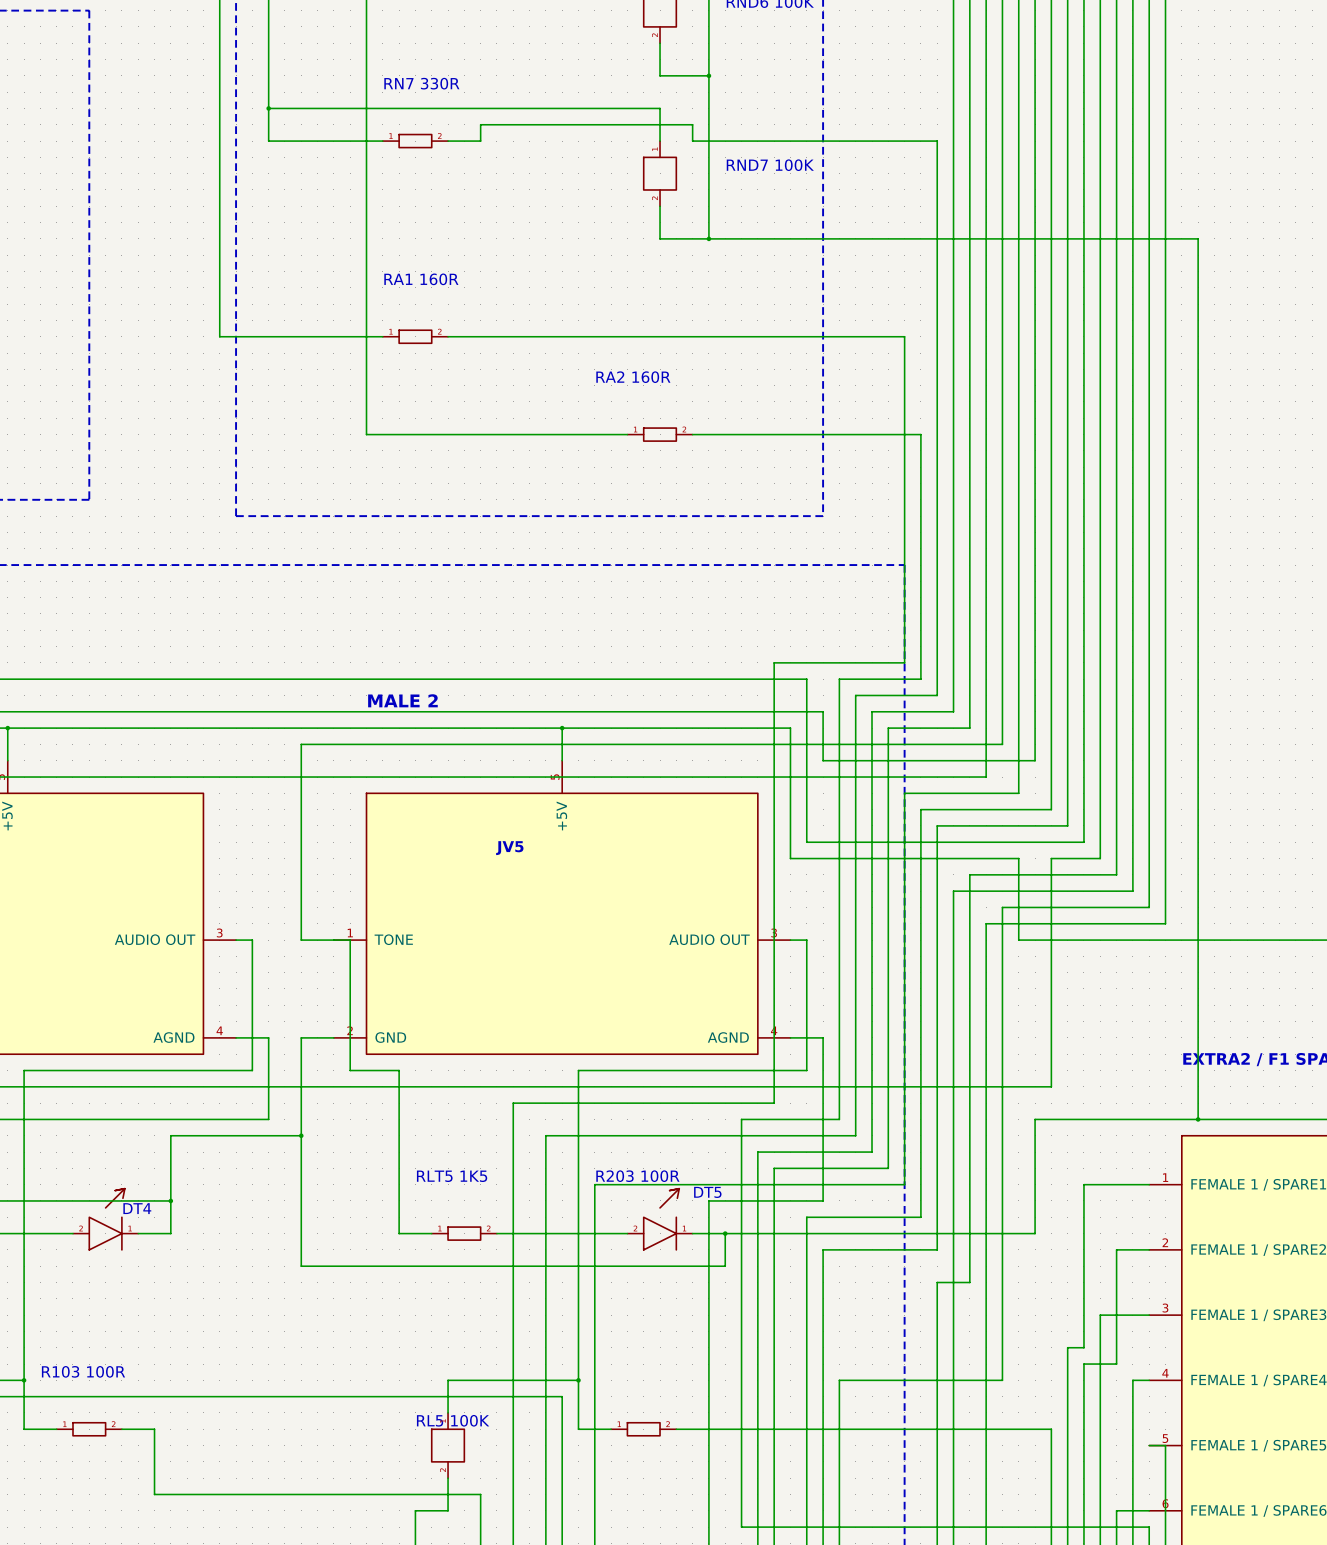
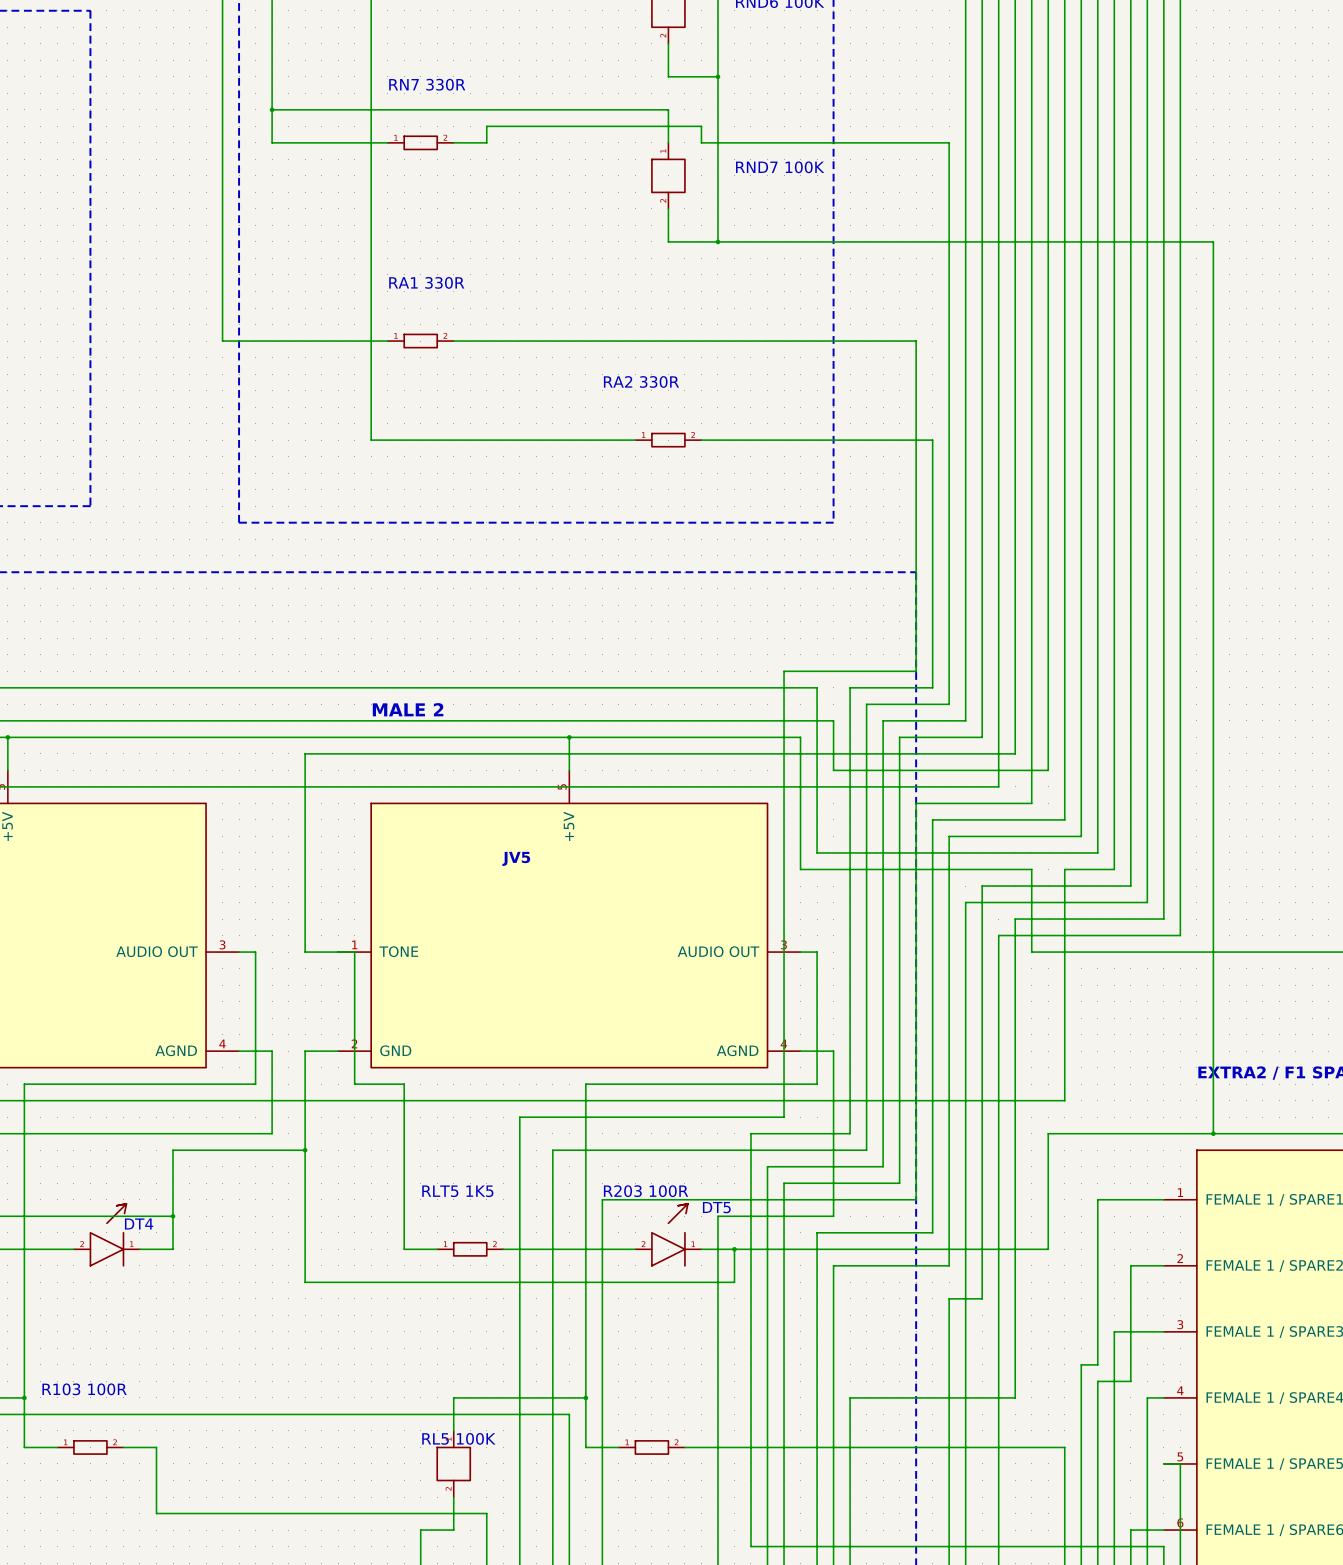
text: RA1 160R (421, 279) -> RA1 330R (426, 282)
text: RA2 160R (633, 377) -> RA2 330R (641, 381)

